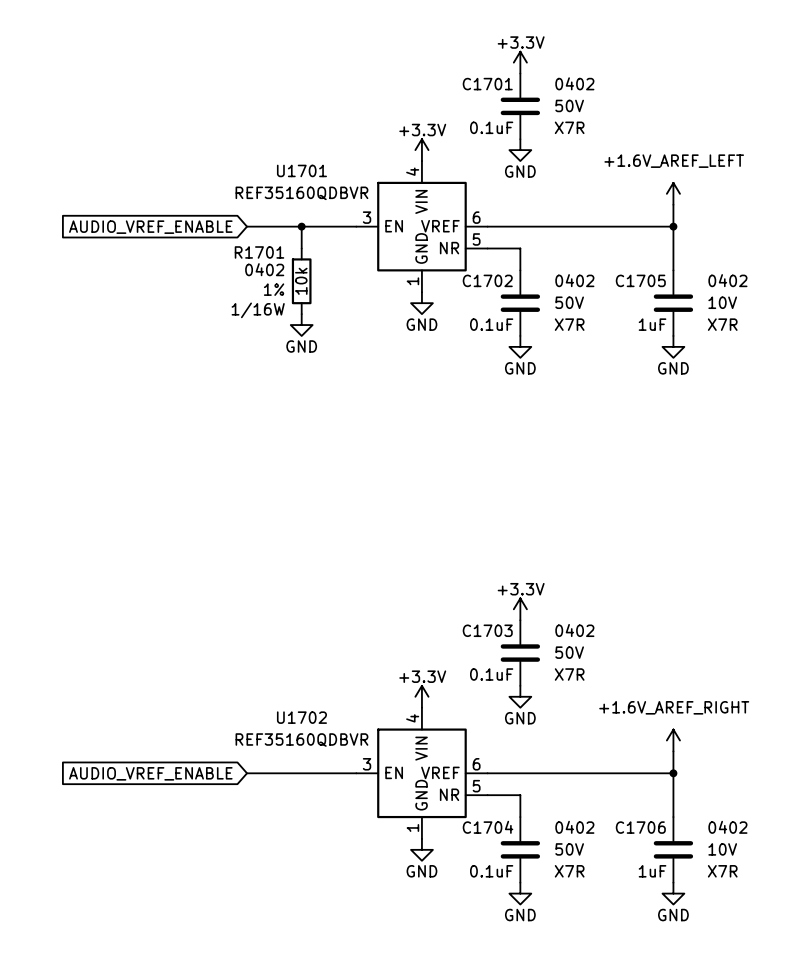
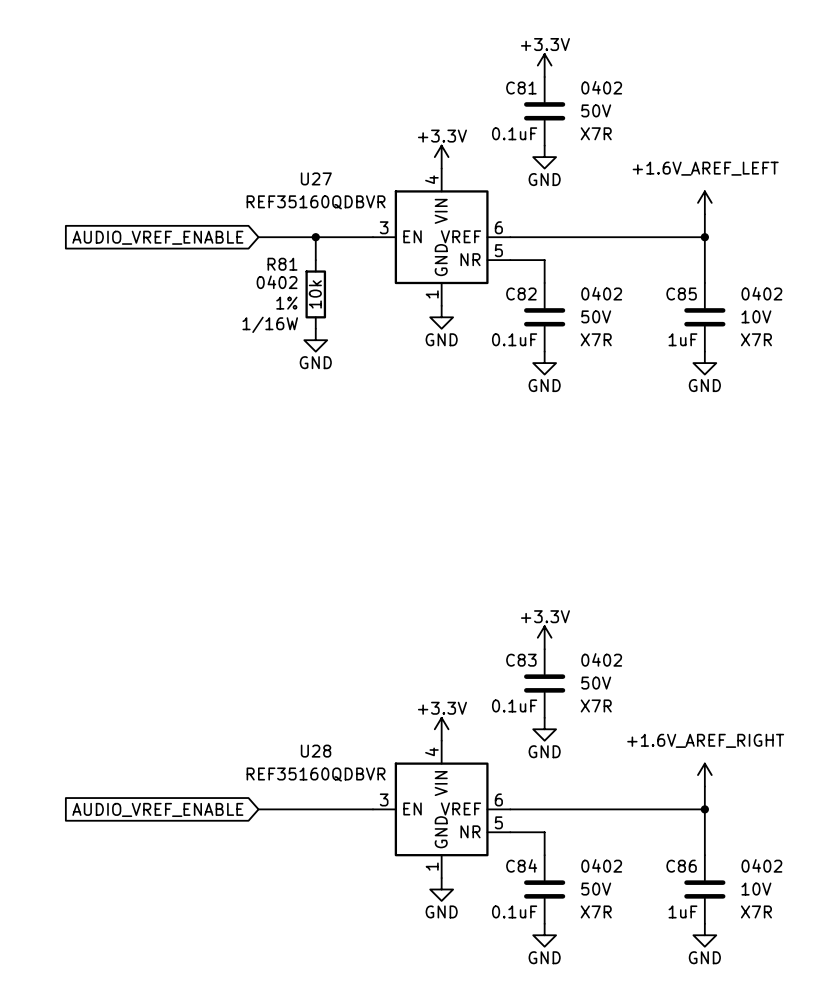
C1701 name: C1701 (487, 84) -> C81 (521, 88)
U1701 name: U1701 (301, 170) -> U27 (316, 178)
R1701 name: R1701 (259, 252) -> R81 (282, 264)
C1702 name: C1702 (487, 280) -> C82 (521, 294)
C1705 name: C1705 (640, 280) -> C85 (681, 294)
C1703 name: C1703 (487, 630) -> C83 (521, 660)
U1702 name: U1702 (301, 717) -> U28 (316, 751)
C1704 name: C1704 (488, 827) -> C84 (521, 865)
C1706 name: C1706 (640, 827) -> C86 (681, 866)

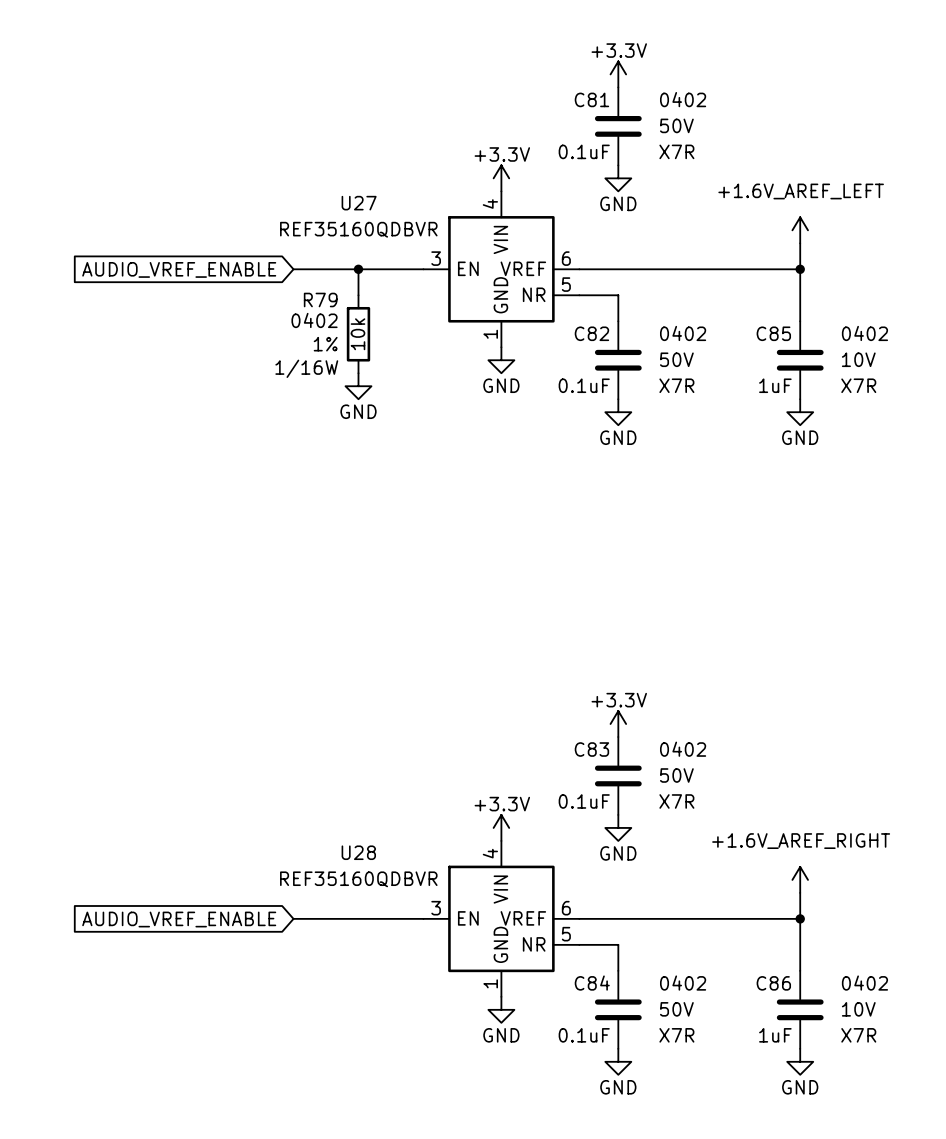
R81 name: R81 (282, 264) -> R79 (320, 300)

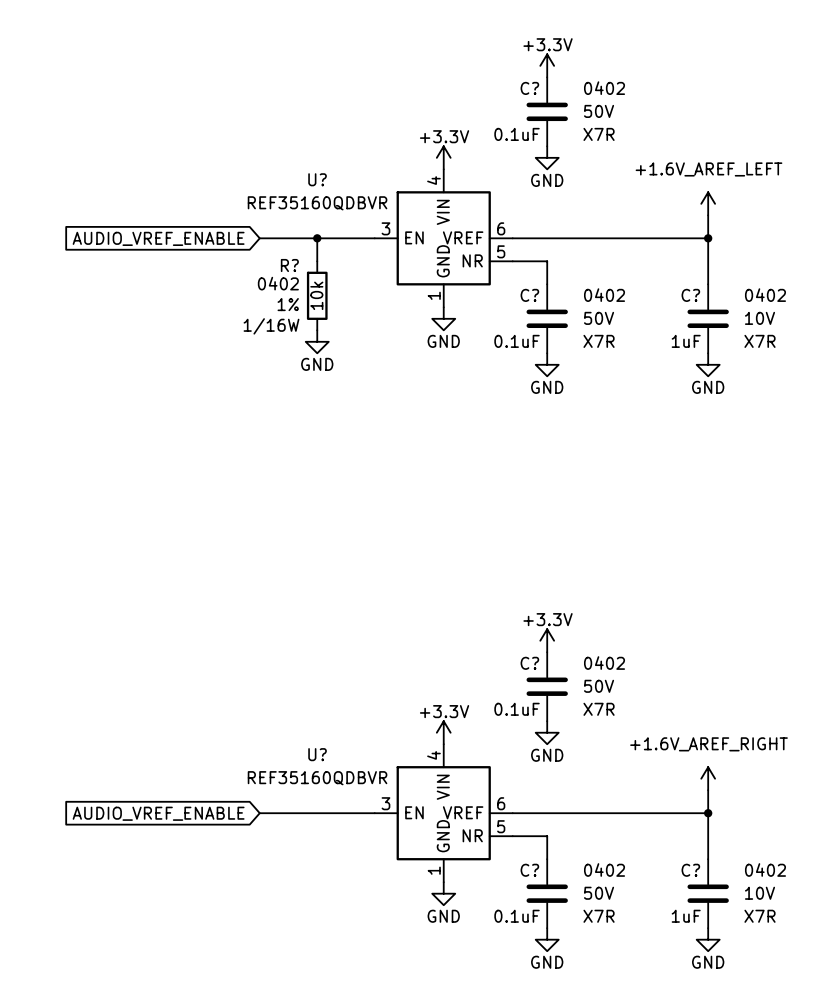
C81 name: C81 (591, 99) -> C? (529, 88)
U27 name: U27 (359, 203) -> U? (317, 179)
R79 name: R79 (320, 300) -> R? (289, 265)
C82 name: C82 (591, 333) -> C? (529, 295)
C85 name: C85 (773, 333) -> C? (690, 295)
C83 name: C83 (591, 749) -> C? (529, 663)
U28 name: U28 (358, 852) -> U? (317, 754)
C84 name: C84 (592, 983) -> C? (529, 870)
C86 name: C86 (773, 983) -> C? (690, 870)

